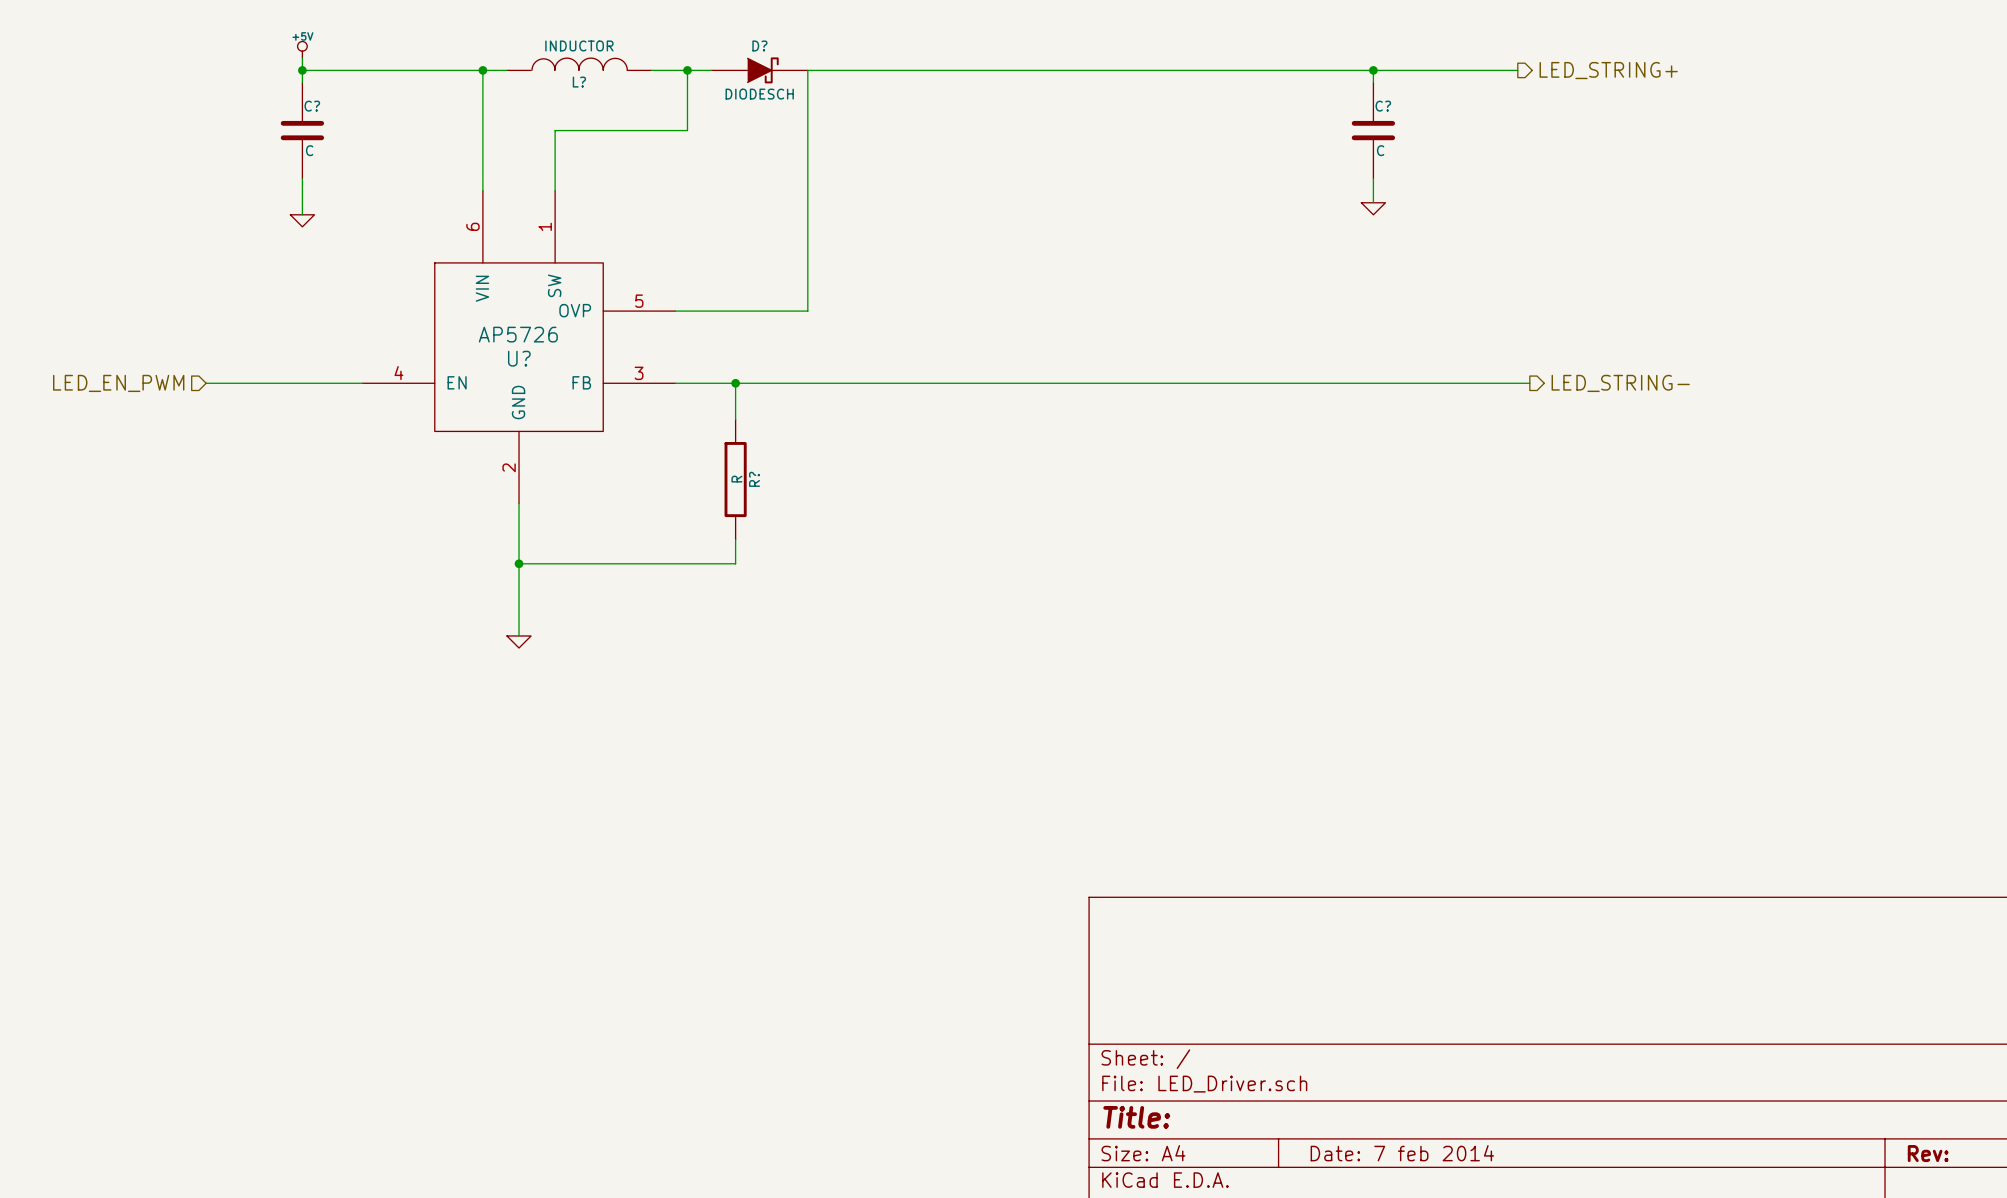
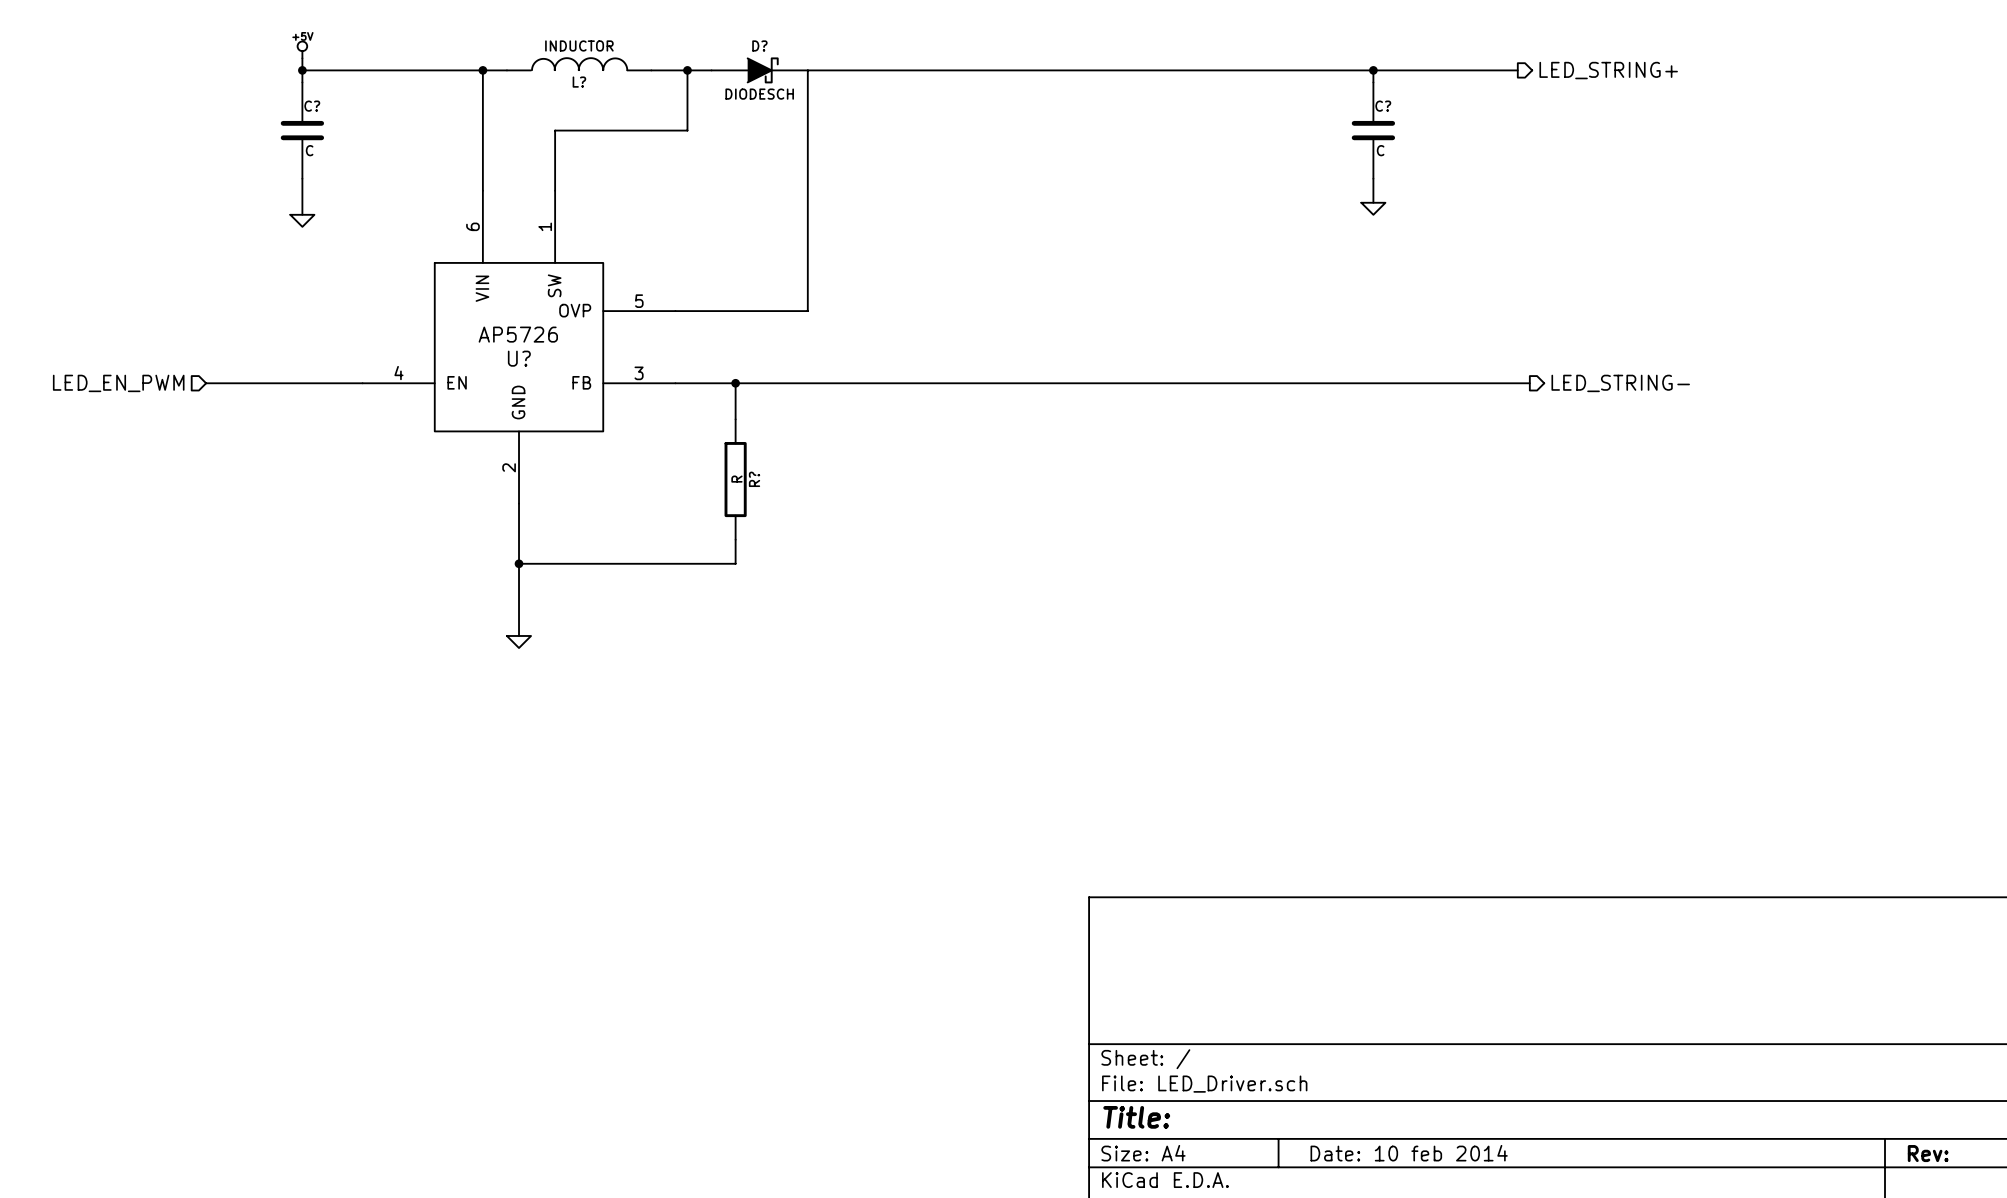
title block: Date: 7 feb 2014 (1402, 1153) -> Date: 10 feb 2014 (1409, 1153)

